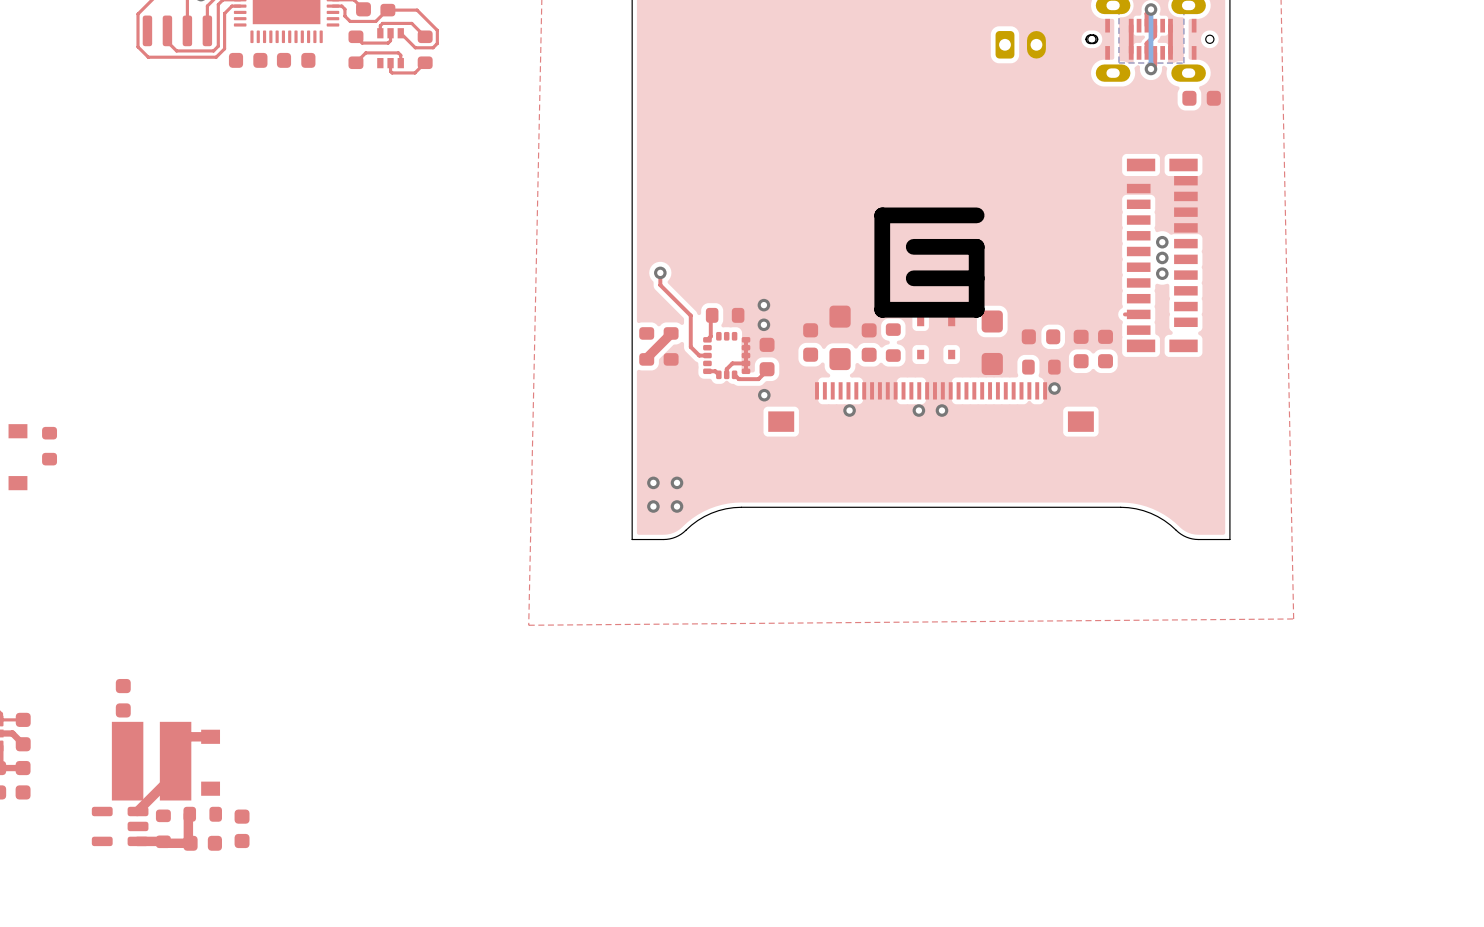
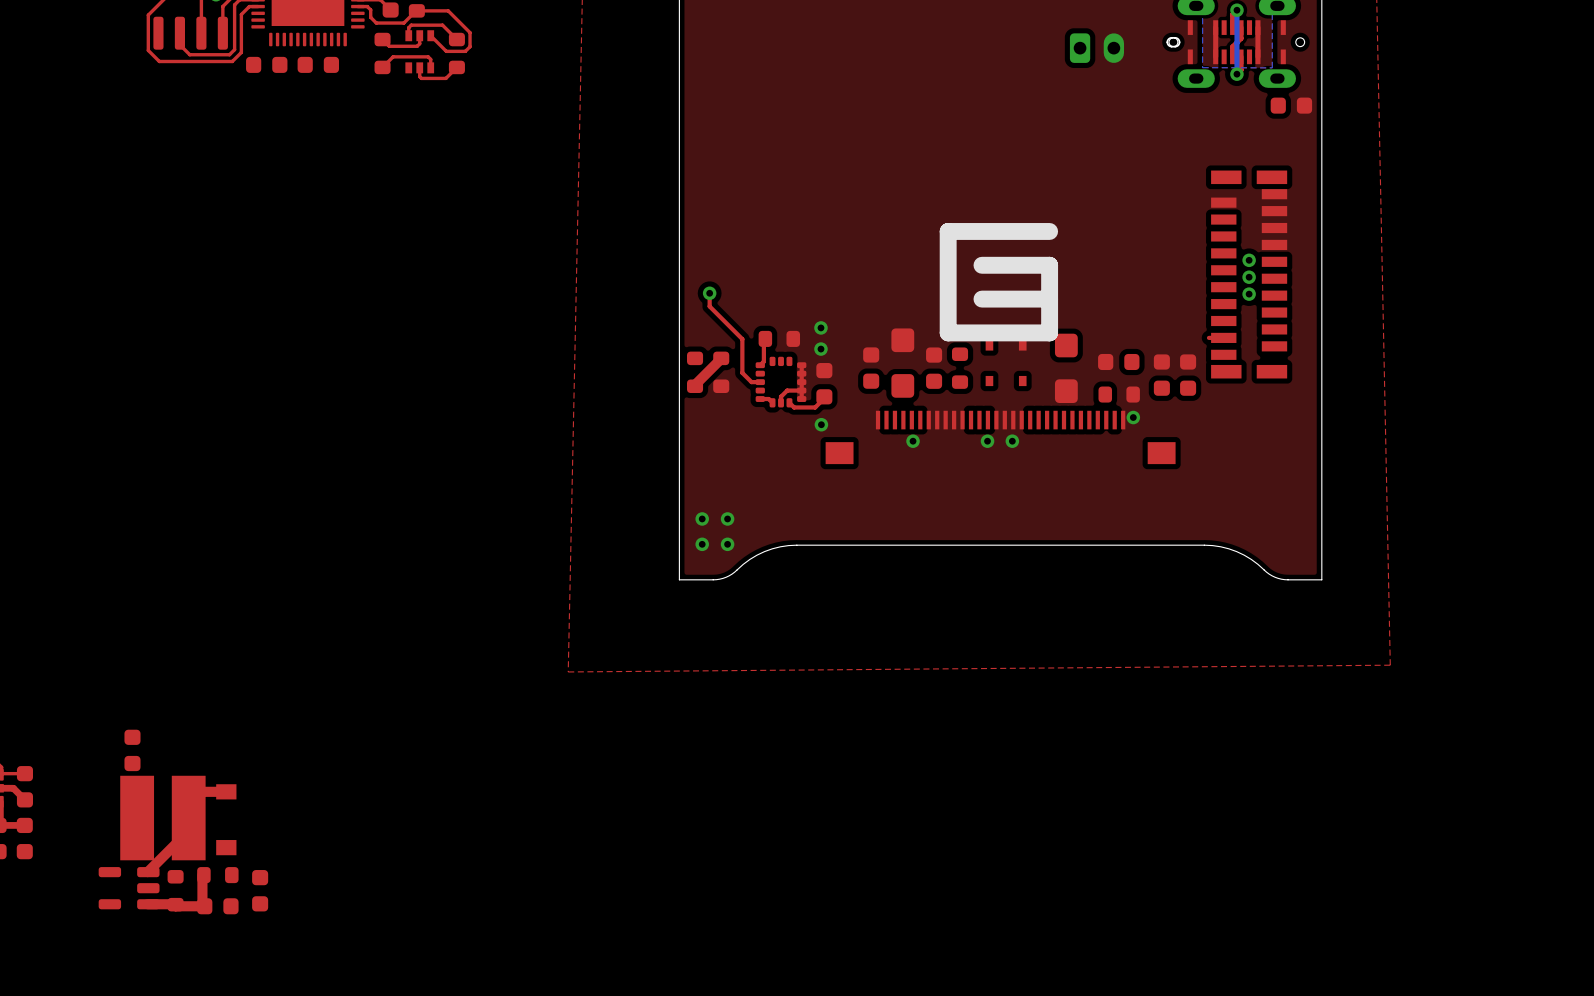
part: (49, 446) -> none
part: (17, 457) -> none

